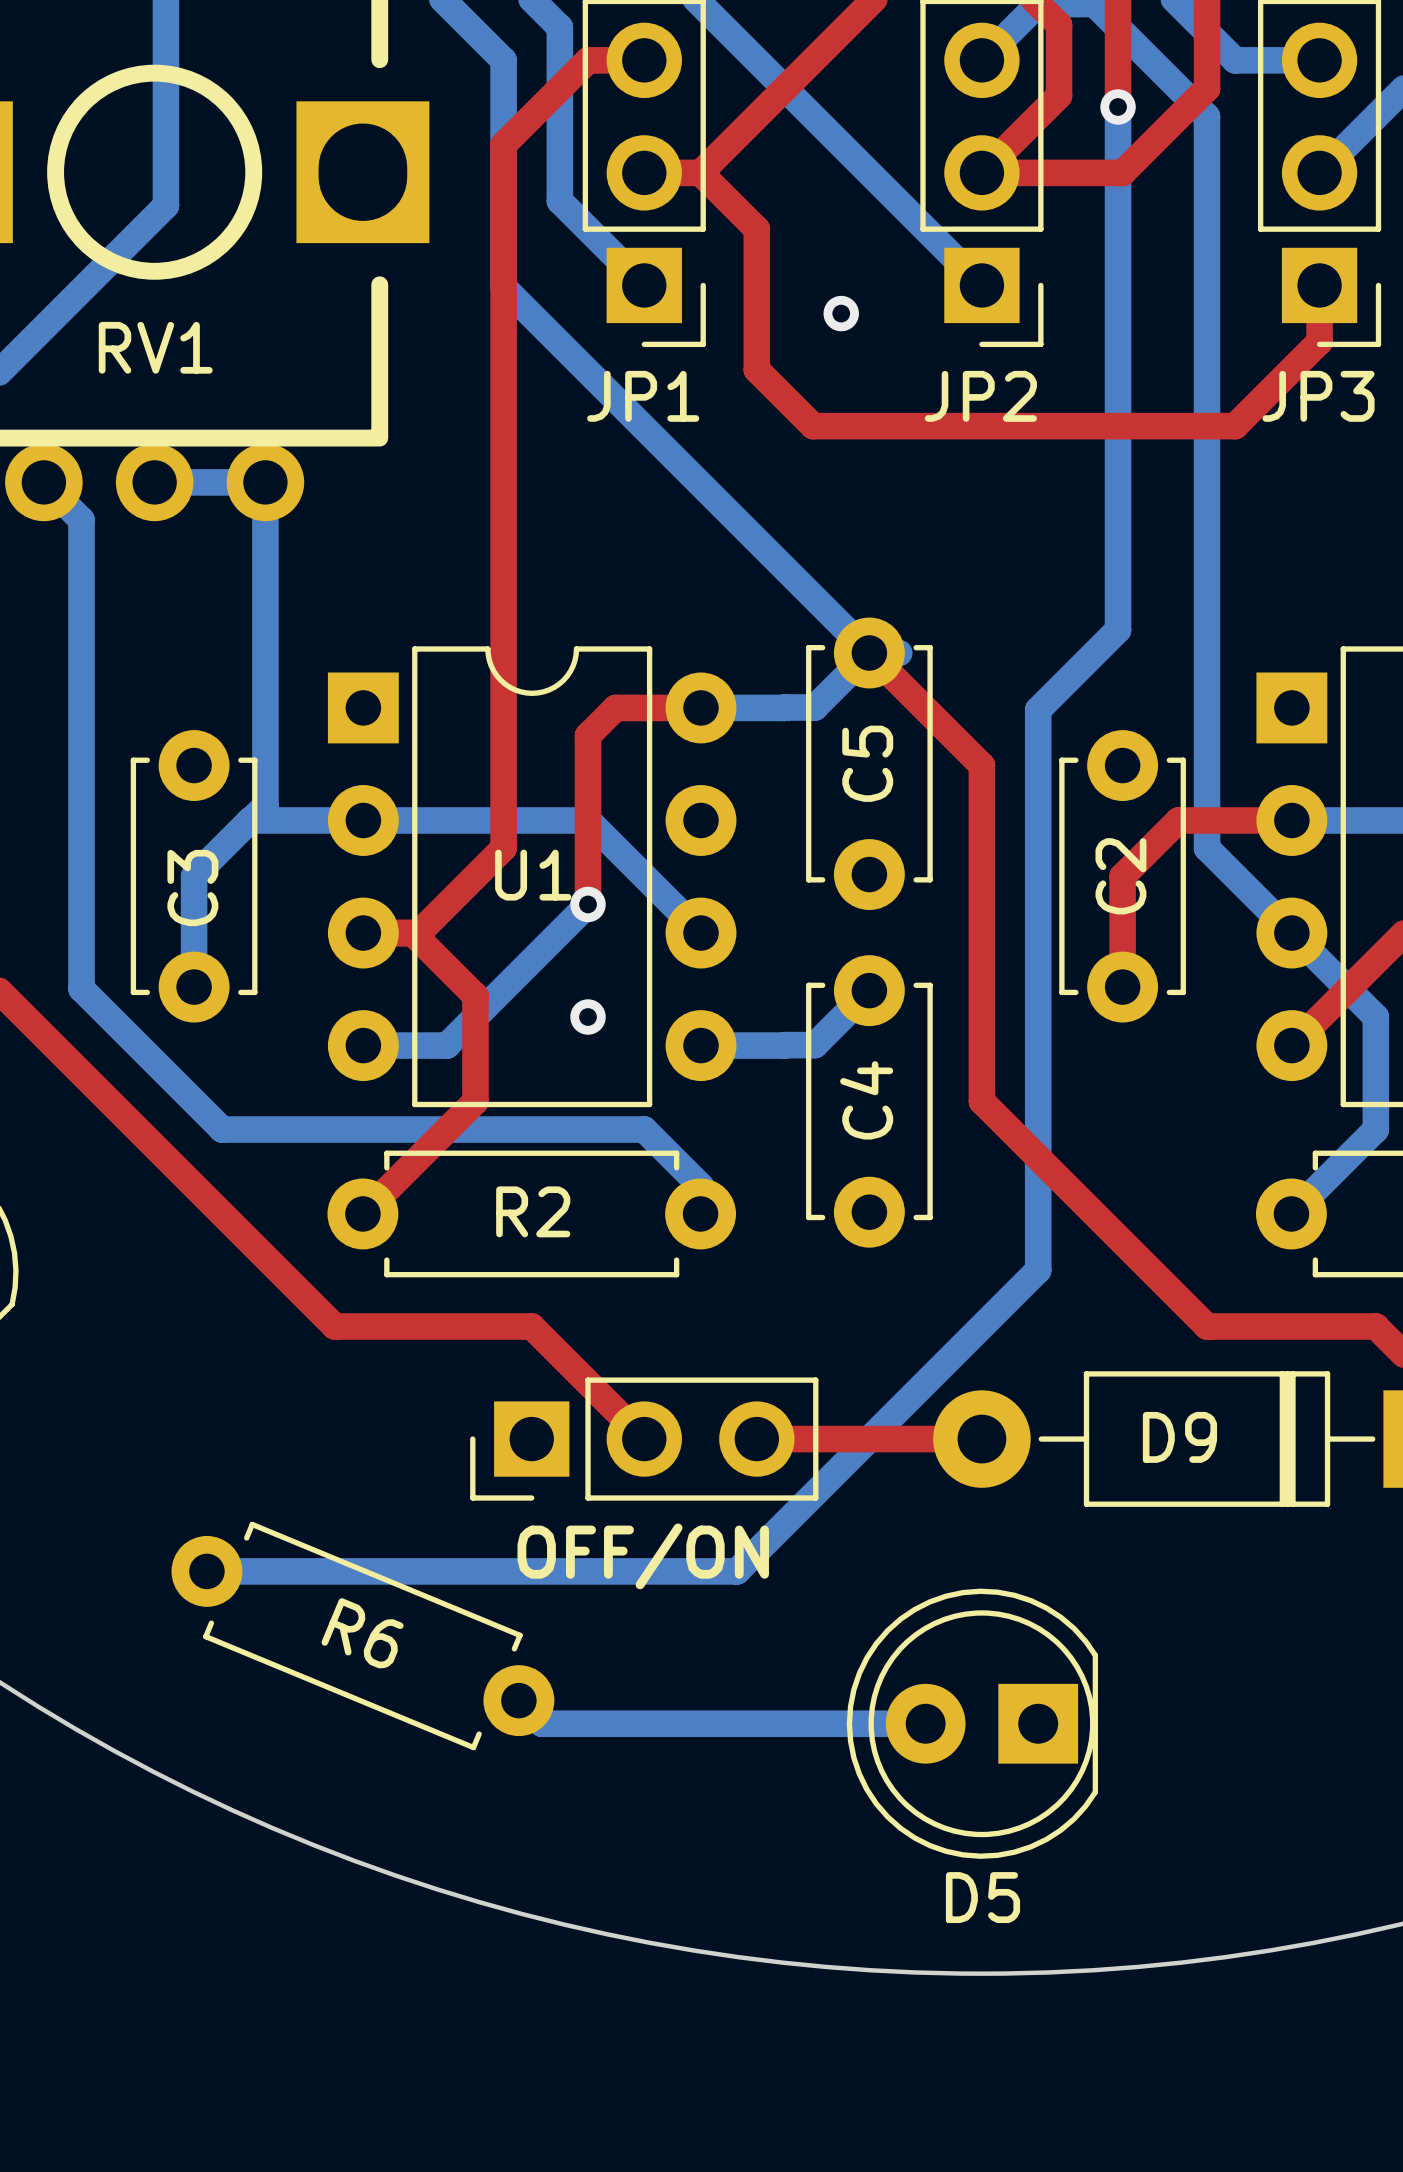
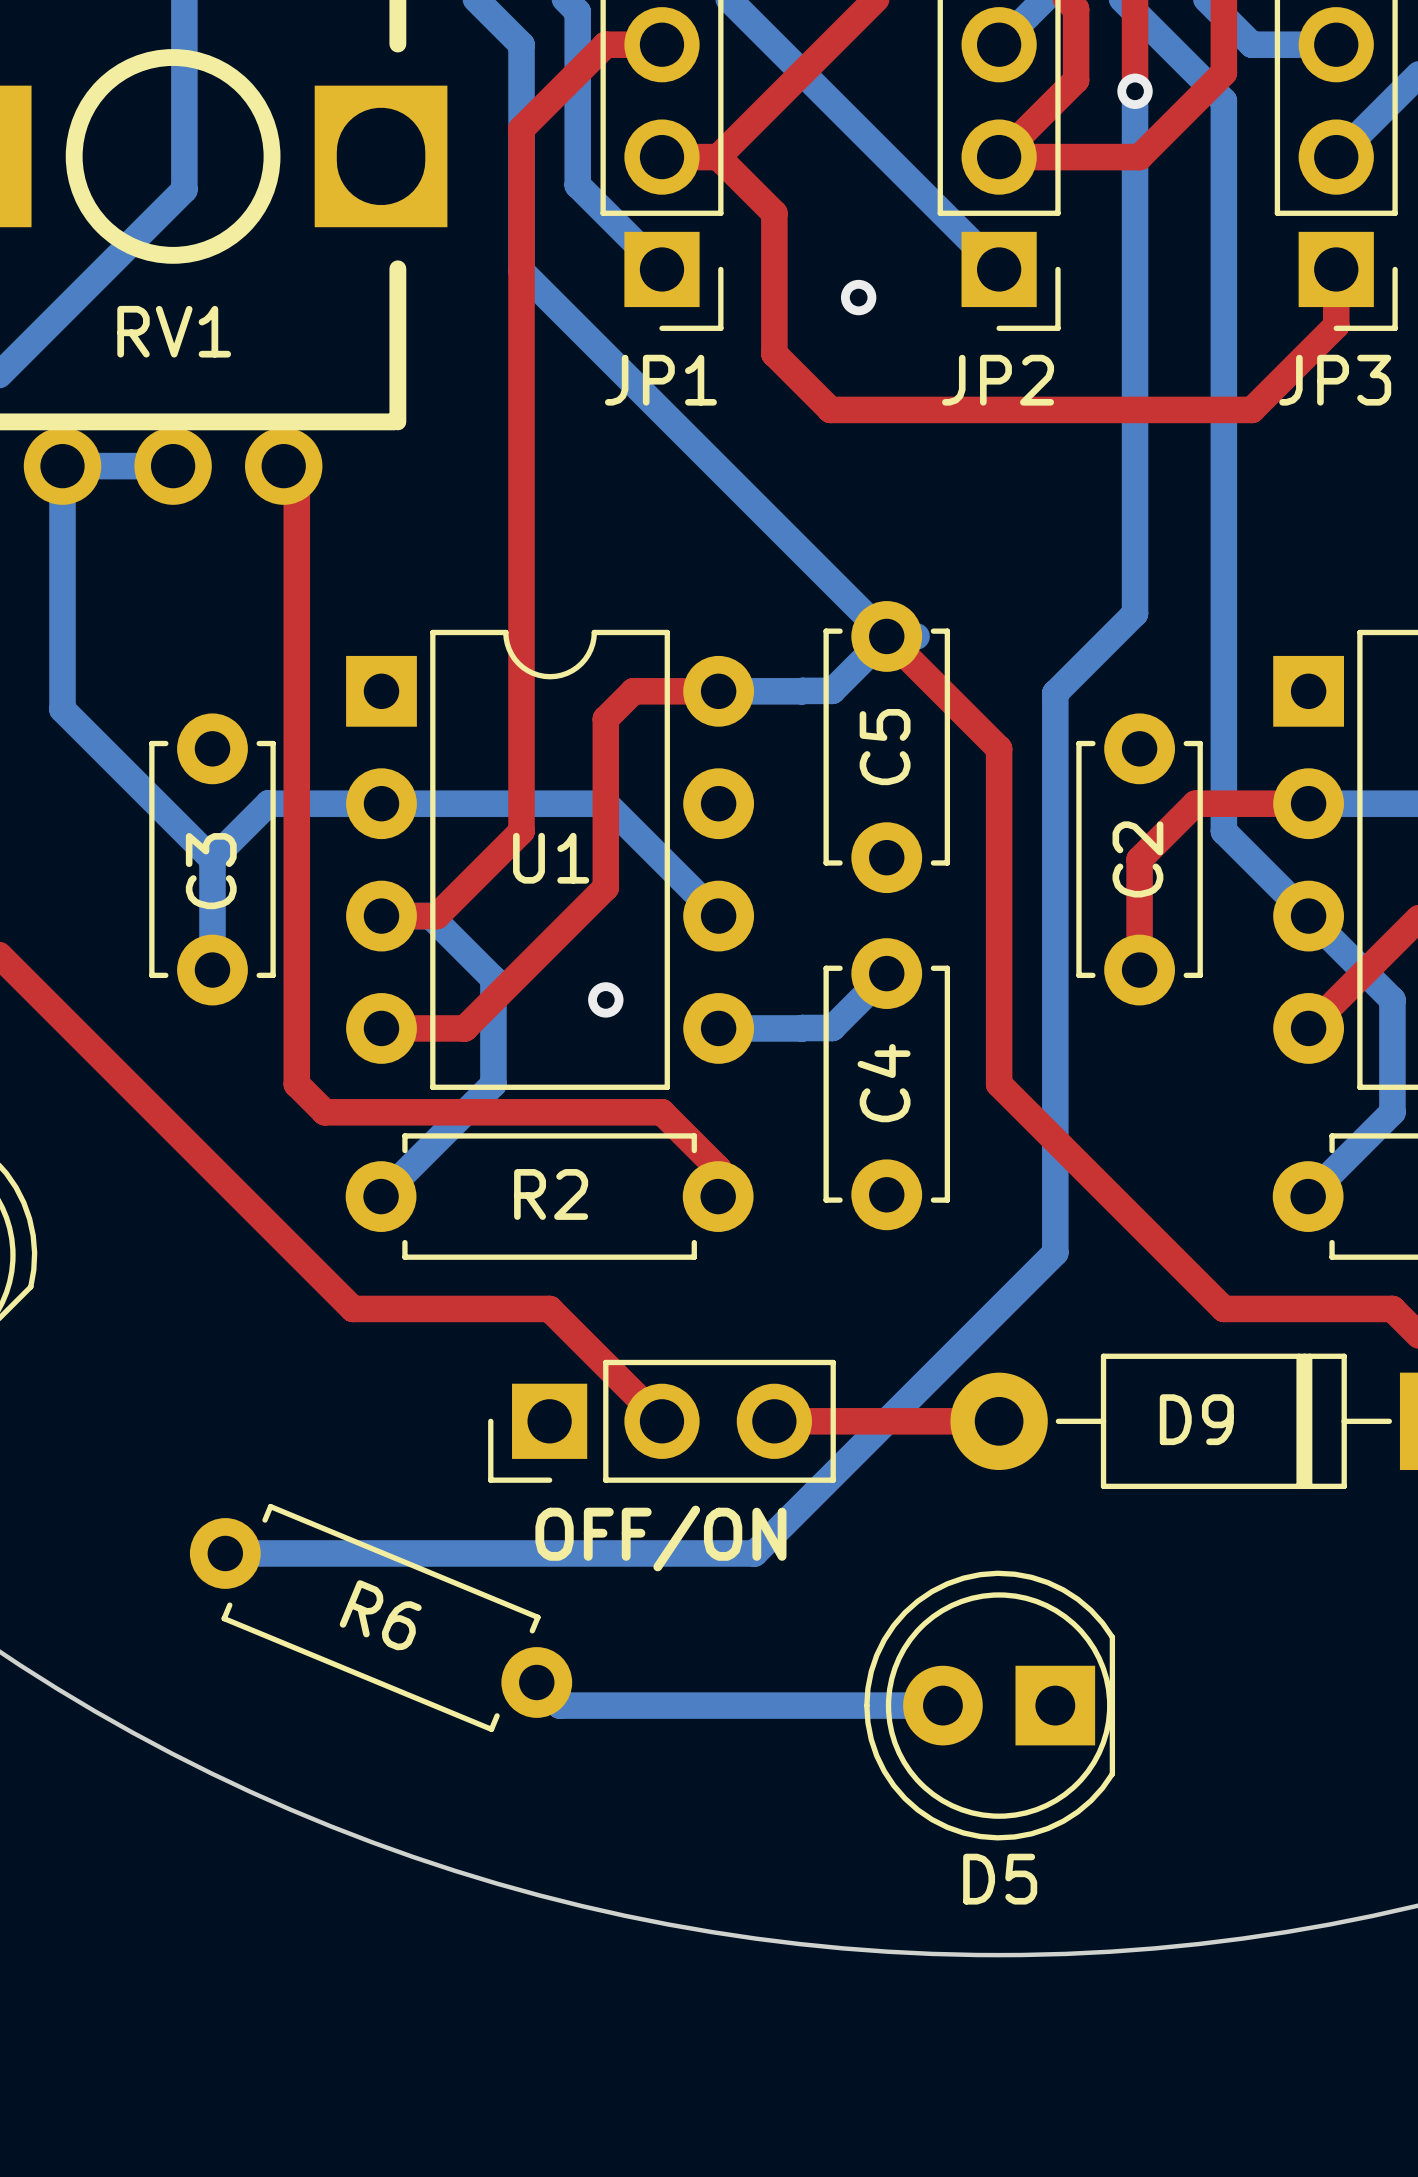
bottom track: (43, 482) (81, 520) (81, 988) (222, 1129) (644, 1129) (700, 1185) (700, 1213) -> none
bottom track: (154, 482) (265, 482) (265, 805) (250, 820) -> (173, 466) (62, 466) (62, 709) (212, 859)
top track: none -> (283, 466) (296, 479) (296, 1084) (324, 1112) (661, 1112) (718, 1168) (718, 1196)
top track: none -> (605, 887) (464, 1028) (381, 1028)
bottom track: (588, 904) (446, 1045) (363, 1045) -> none
via: (588, 904) -> none
bottom track: none -> (381, 916) (430, 916) (493, 978) (493, 1084) (381, 1196)
top track: (412, 933) (475, 995) (475, 1101) (362, 1213) -> none

